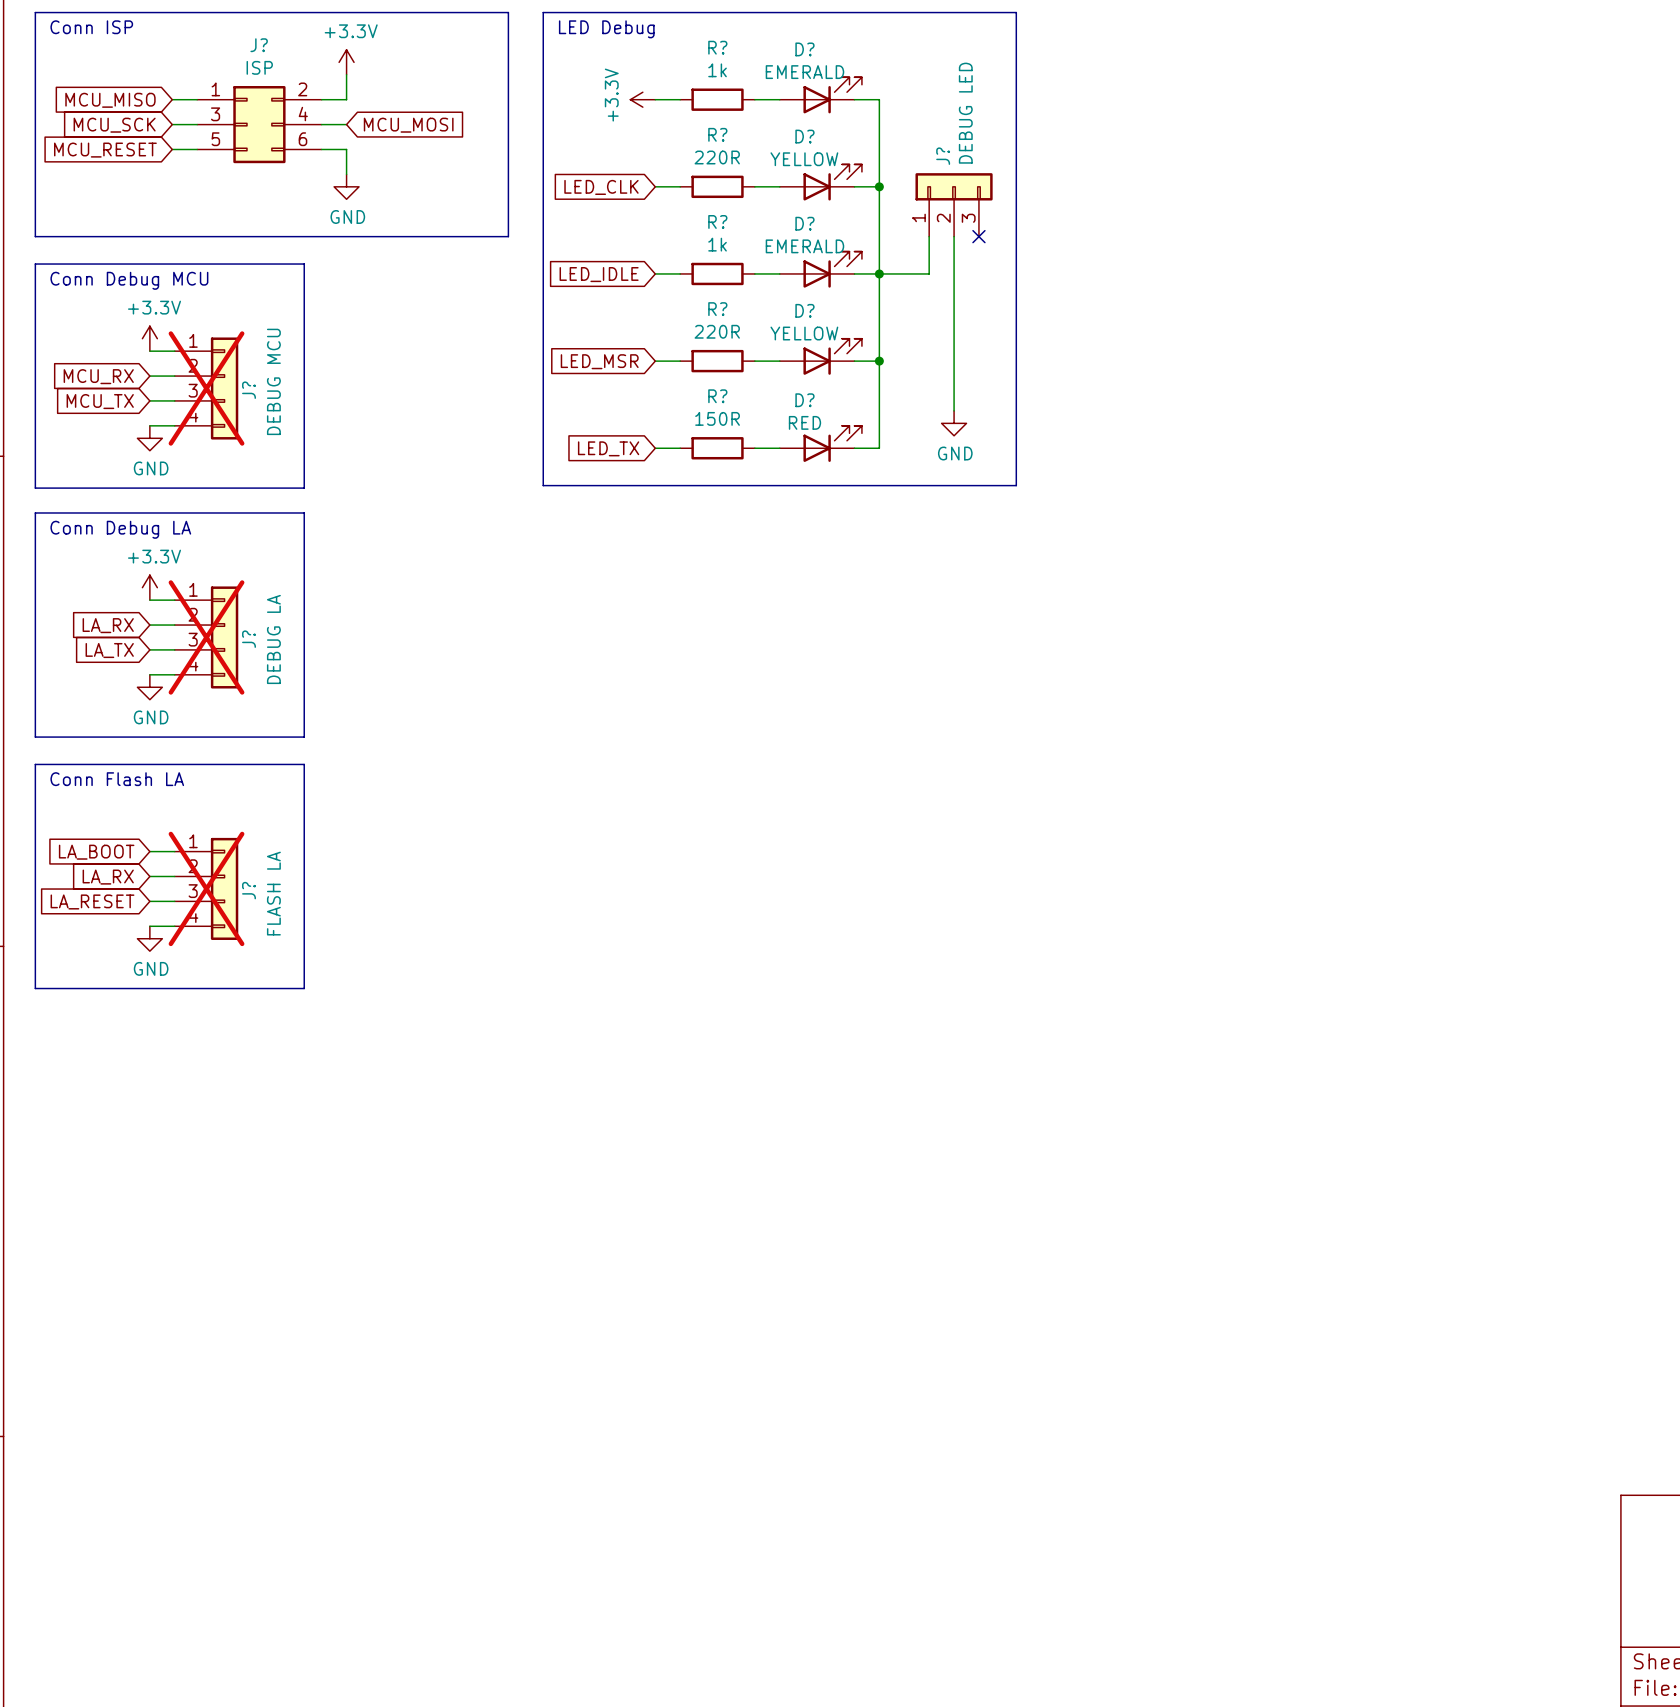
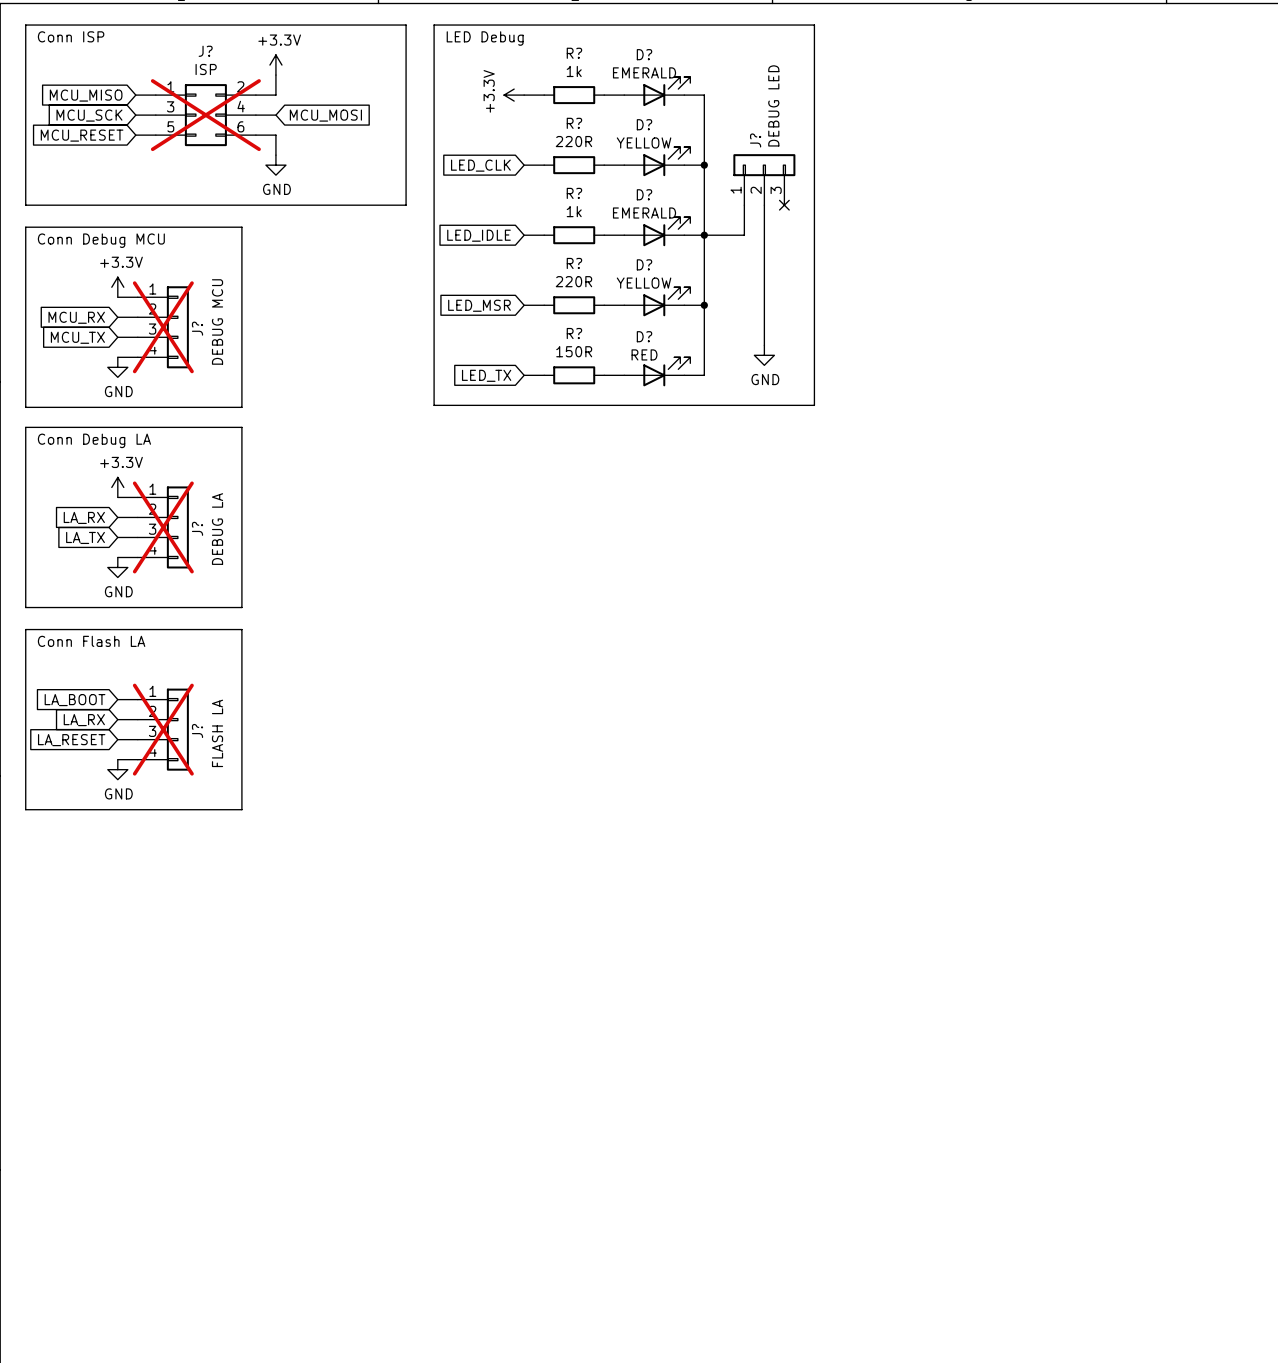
J? do-not-place cross: none -> (205, 115)

